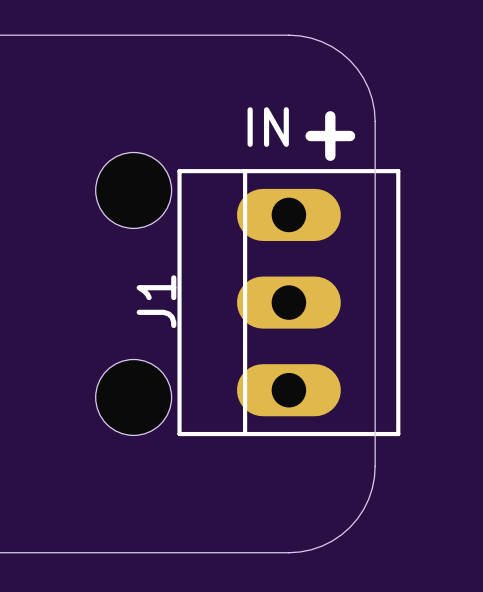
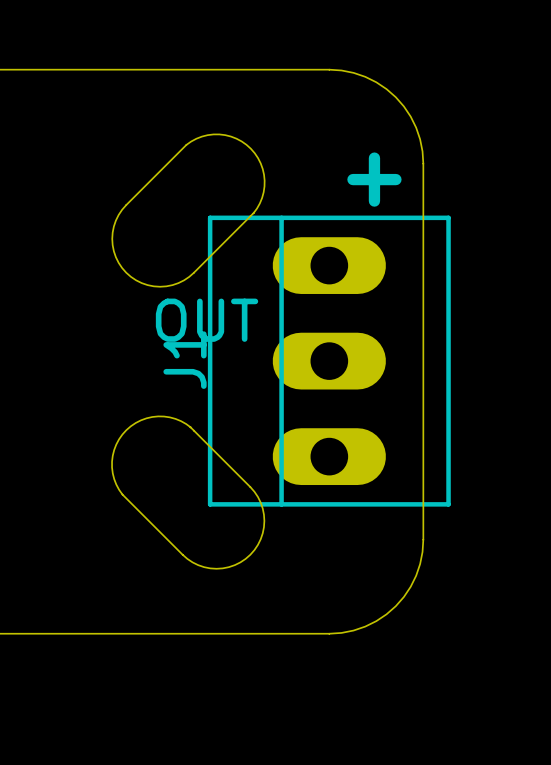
J1 value: IN (268, 127) -> OUT (207, 320)
board edge: none -> (254, 212) (193, 272) (184, 280) (172, 285) (153, 286) (136, 280) (122, 268) (113, 251) (112, 238) (113, 226) (122, 209) (186, 144) (201, 136) (219, 134) (236, 138) (246, 144) (258, 158) (262, 168) (264, 186) (262, 197) (257, 208) (253, 213)
part: (133, 190) -> none
board edge: none -> (190, 426) (250, 487) (257, 496) (262, 508) (263, 527) (257, 544) (245, 558) (228, 567) (216, 568) (204, 567) (187, 558) (122, 494) (114, 479) (112, 461) (116, 444) (122, 434) (135, 422) (146, 418) (164, 416) (175, 418) (186, 424) (190, 427)
part: (133, 397) -> none

